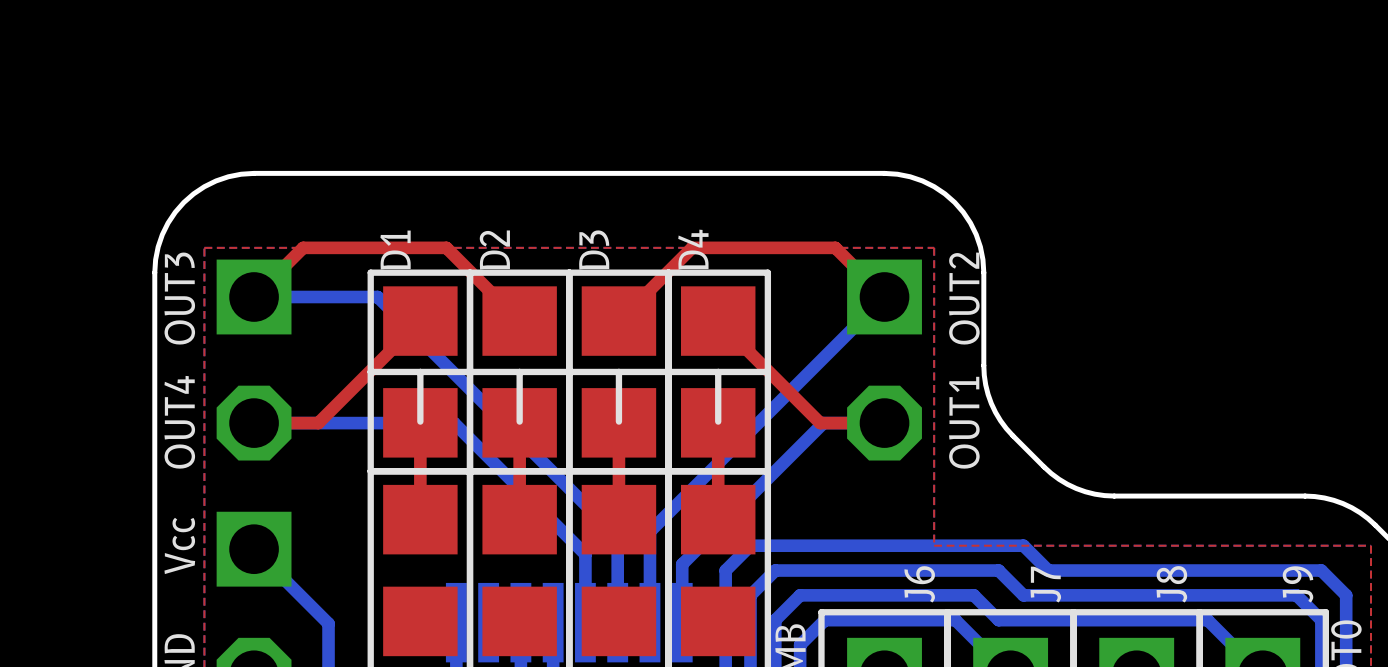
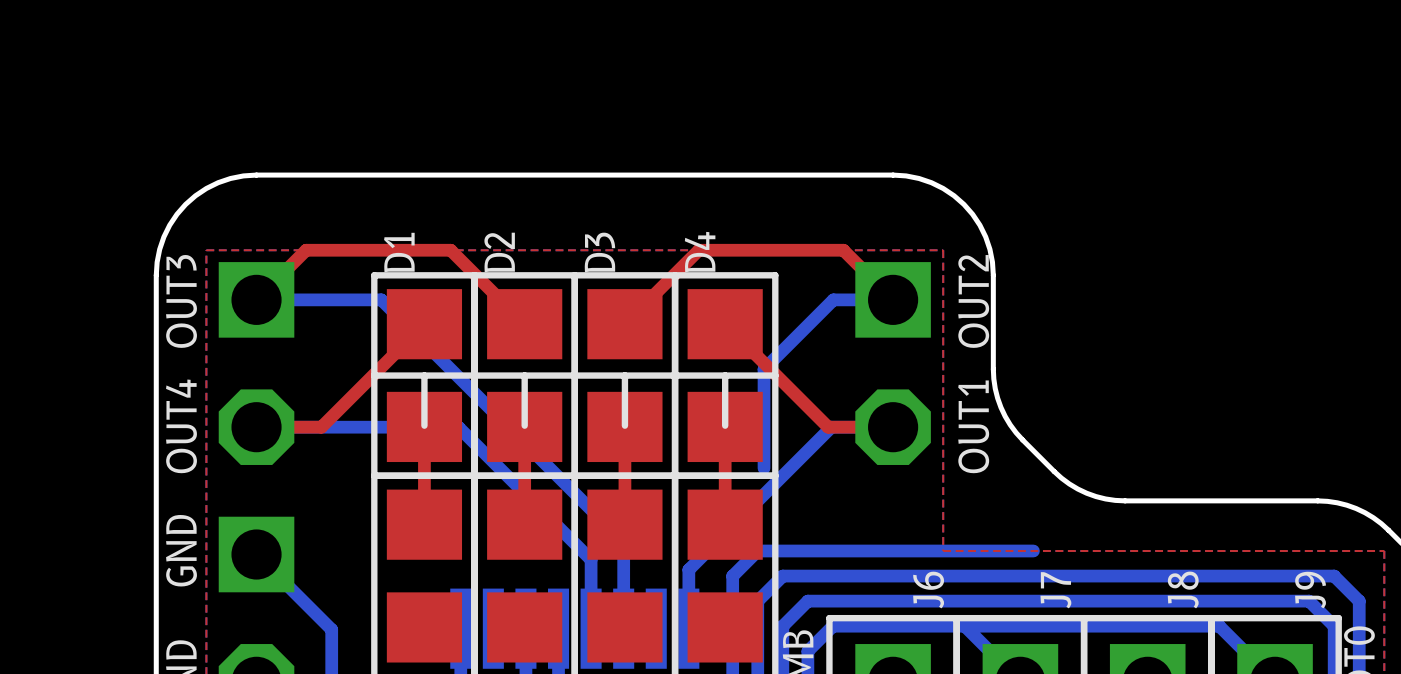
bottom track: (884, 297) (649, 531) (649, 622) -> (893, 299) (833, 299) (764, 369) (764, 468)
text: Vcc (179, 545) -> GND (181, 550)
bottom track: (1023, 545) (1048, 570) -> (1008, 576) (1058, 576)
bottom track: (998, 570) (1023, 595) -> (983, 601) (1033, 601)
bottom track: (973, 595) (998, 620) -> (964, 626) (1008, 626)

